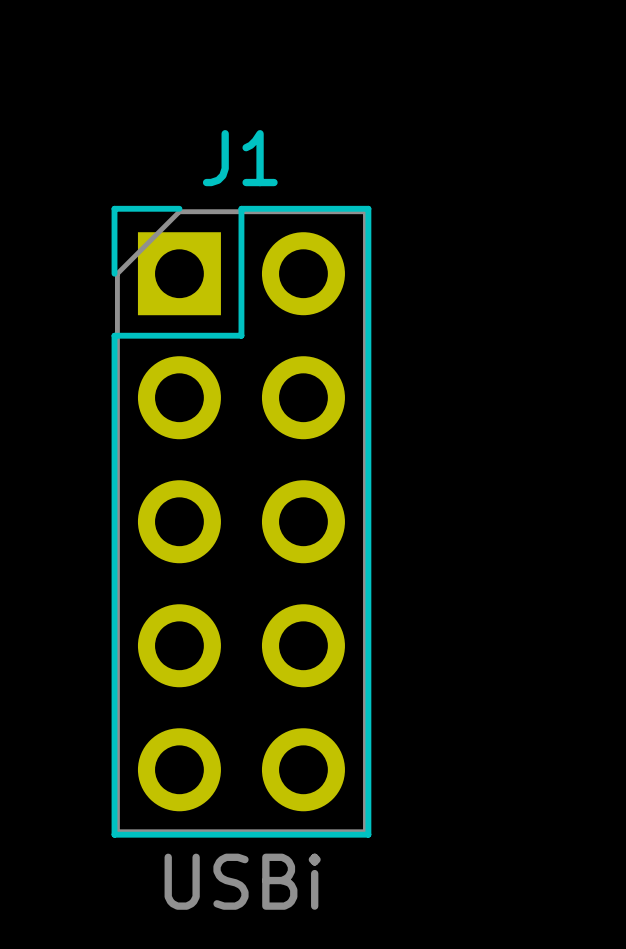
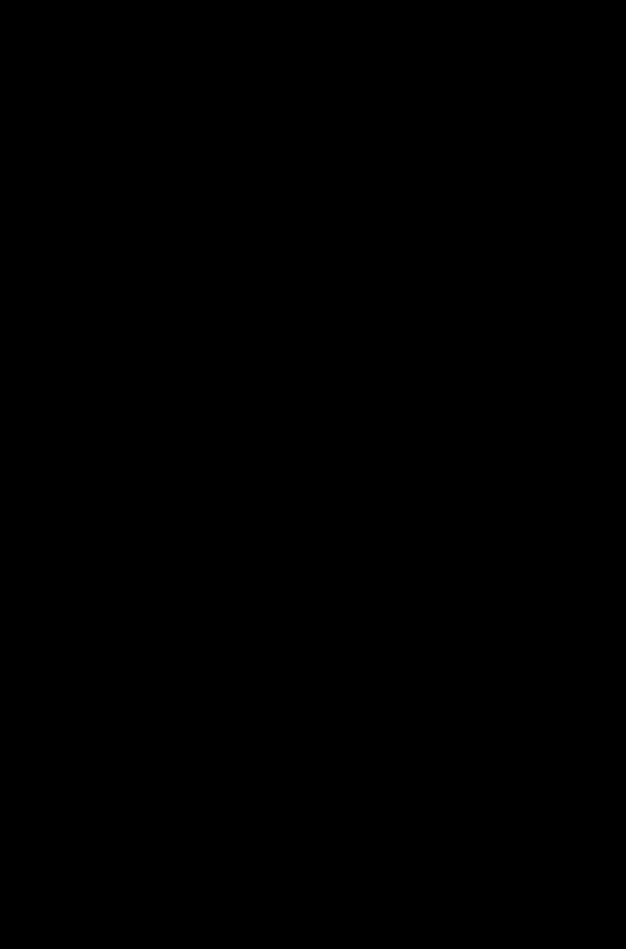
J1: USBi (241, 521) -> none

